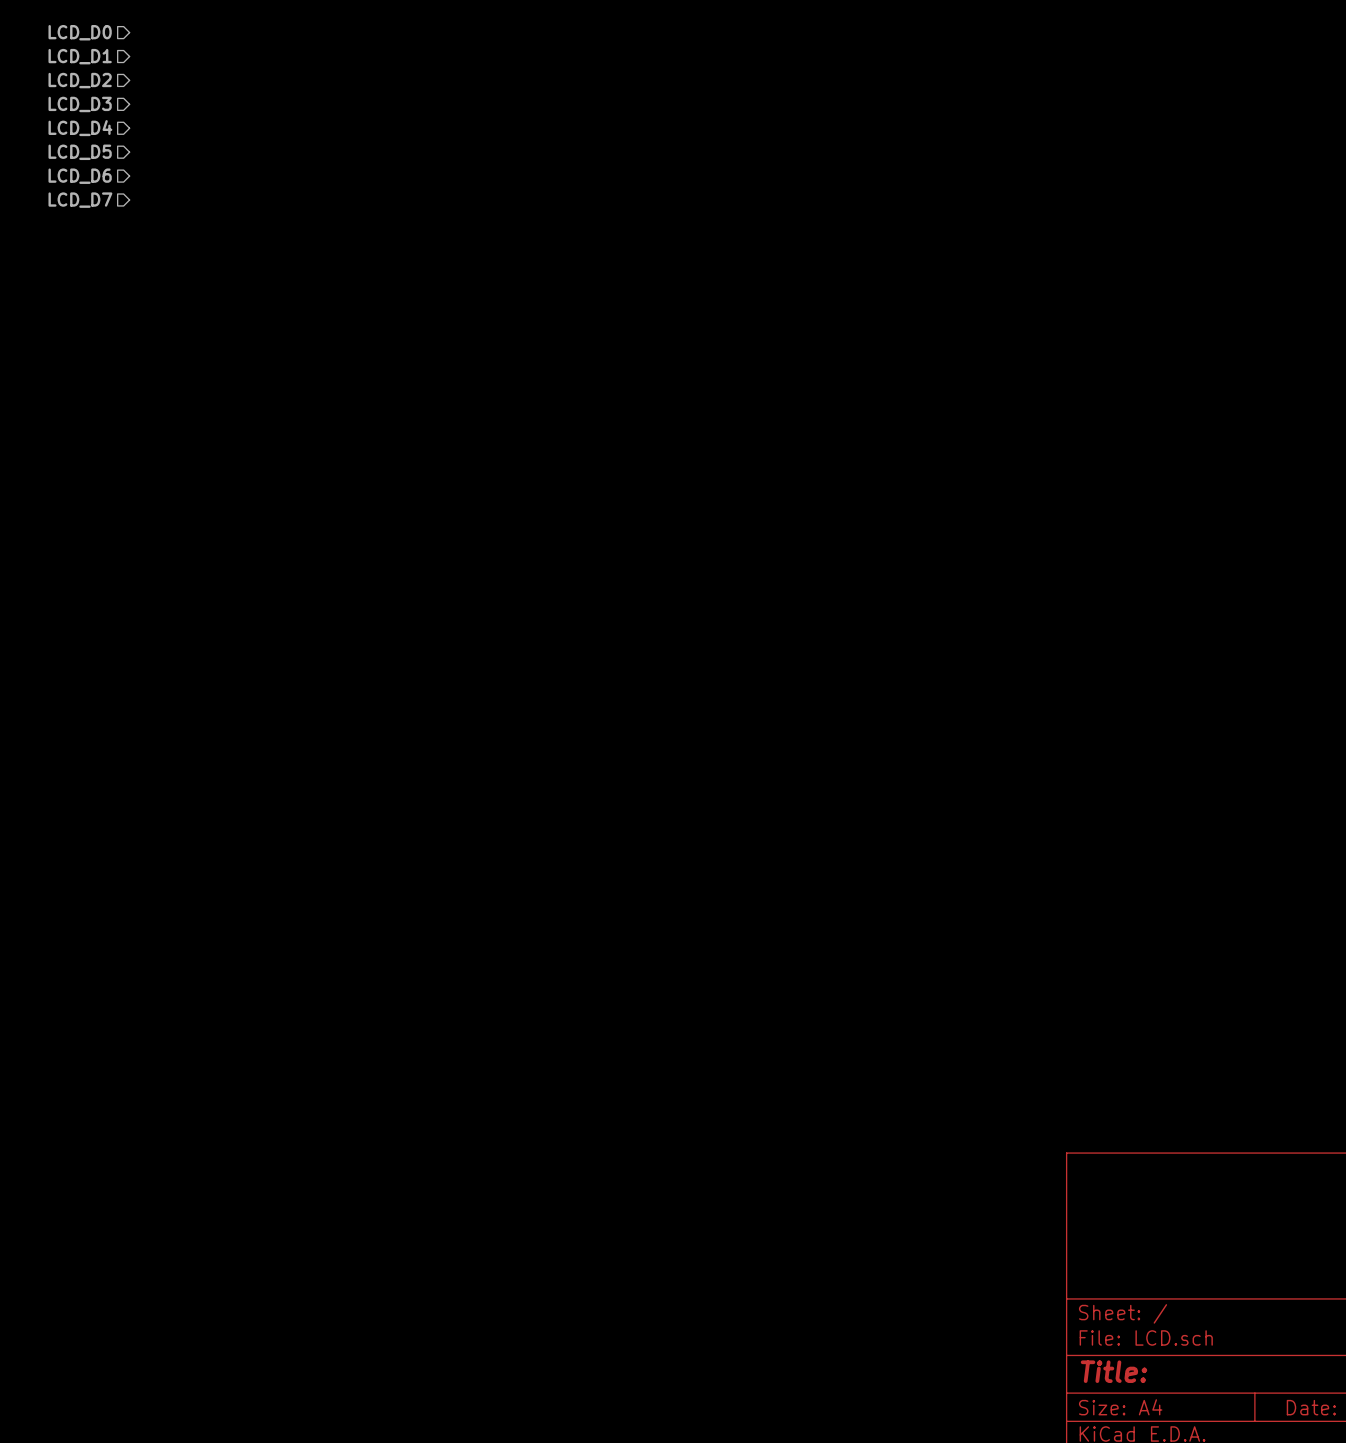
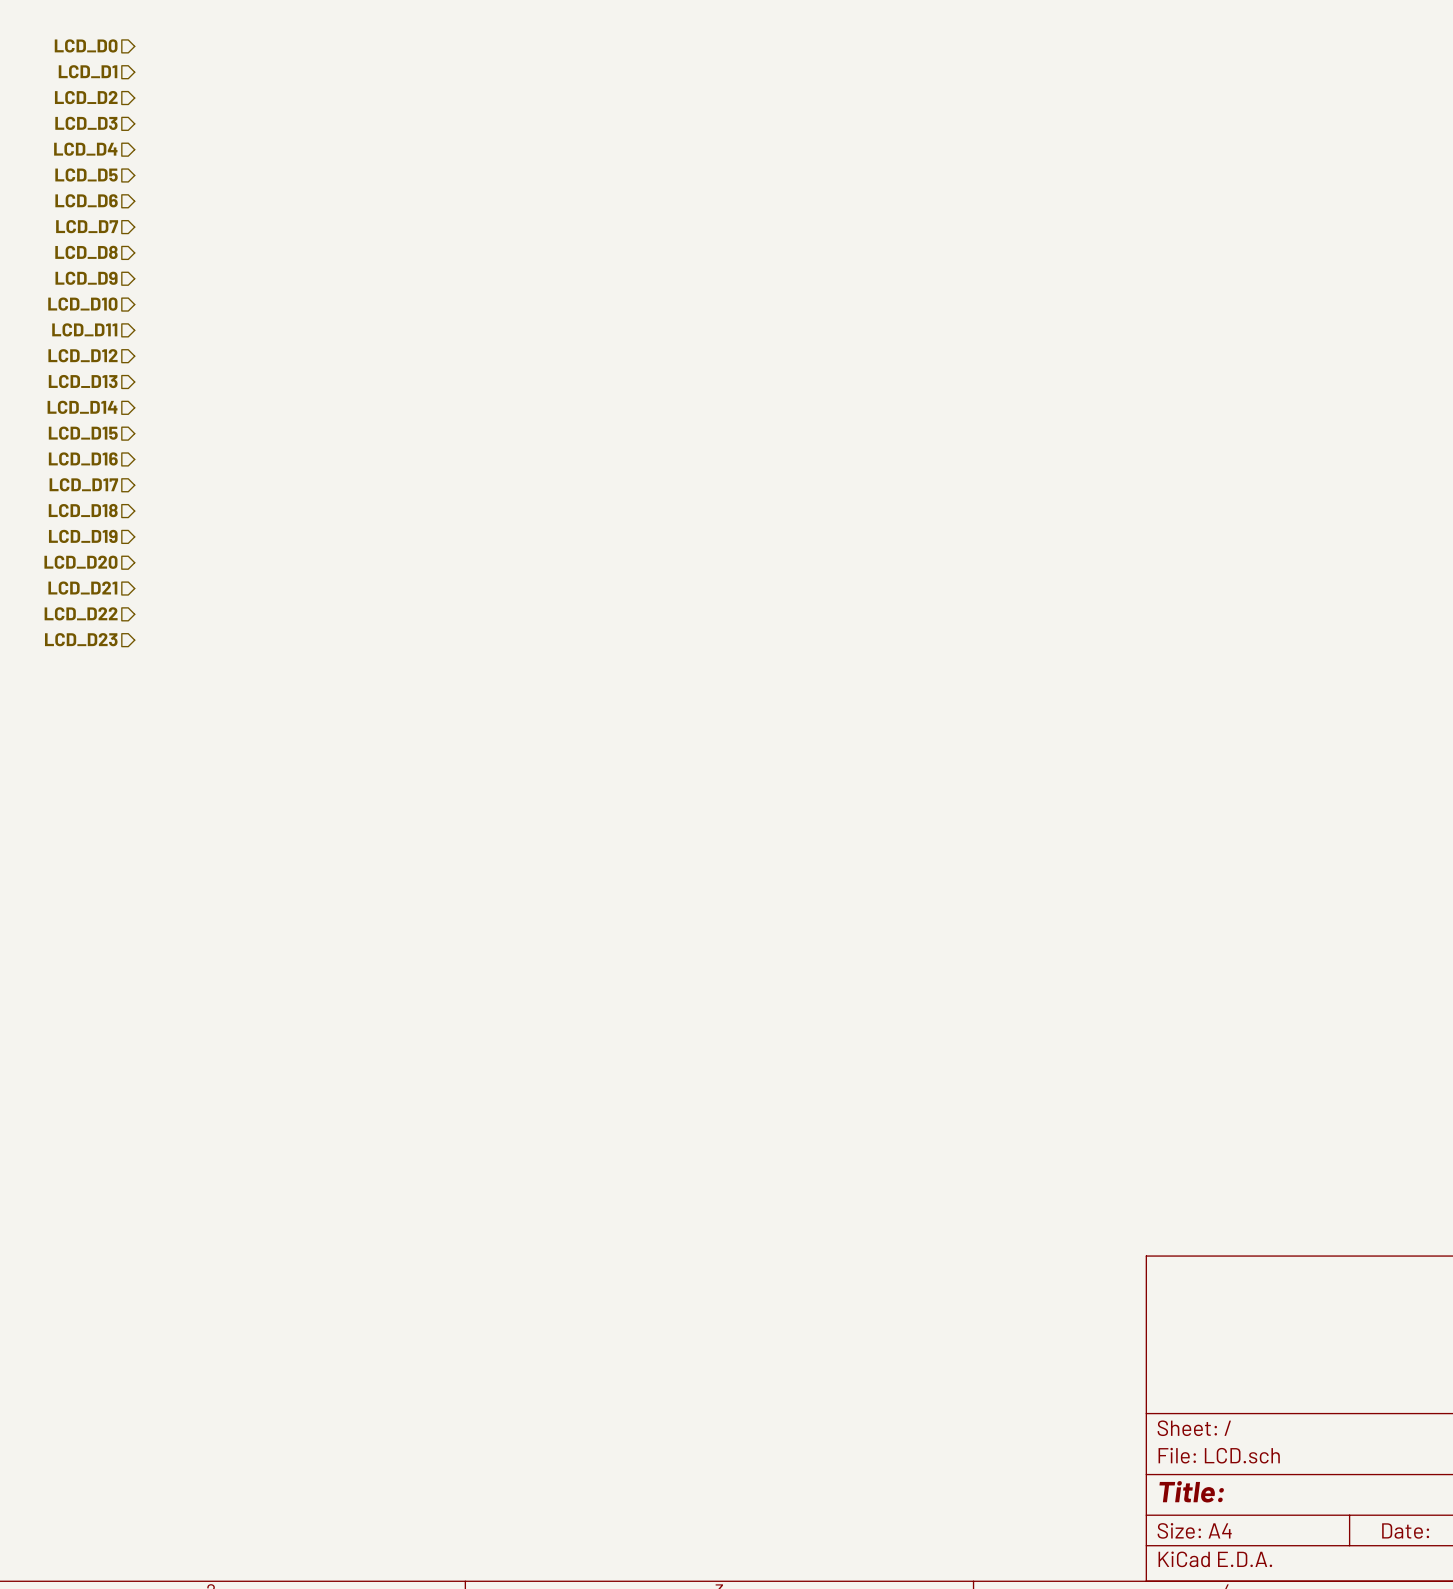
hierarchical label: none -> LCD_D8 (86, 252)
hierarchical label: none -> LCD_D9 (86, 278)
hierarchical label: none -> LCD_D10 (82, 304)
hierarchical label: none -> LCD_D11 (84, 329)
hierarchical label: none -> LCD_D12 (83, 355)
hierarchical label: none -> LCD_D13 (83, 381)
hierarchical label: none -> LCD_D14 (82, 407)
hierarchical label: none -> LCD_D15 (83, 433)
hierarchical label: none -> LCD_D16 (83, 458)
hierarchical label: none -> LCD_D17 (83, 484)
hierarchical label: none -> LCD_D18 (83, 510)
hierarchical label: none -> LCD_D19 (83, 536)
hierarchical label: none -> LCD_D20 (80, 562)
hierarchical label: none -> LCD_D21 (82, 588)
hierarchical label: none -> LCD_D22 (81, 613)
hierarchical label: none -> LCD_D23 (81, 639)

